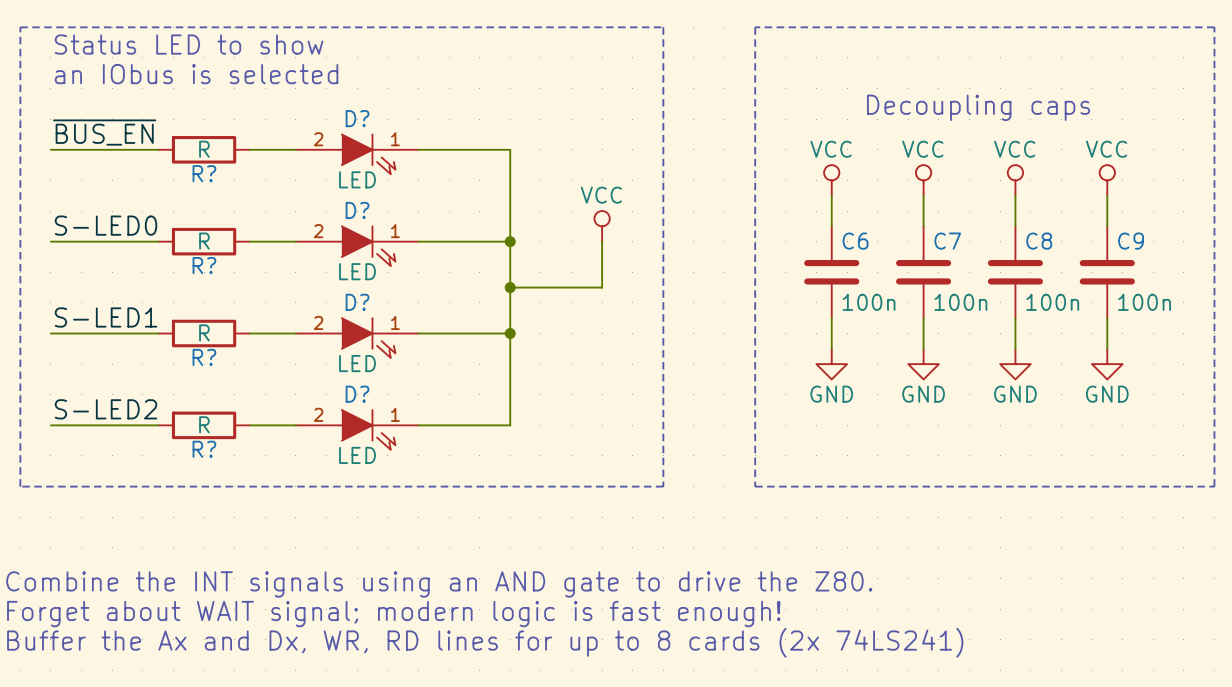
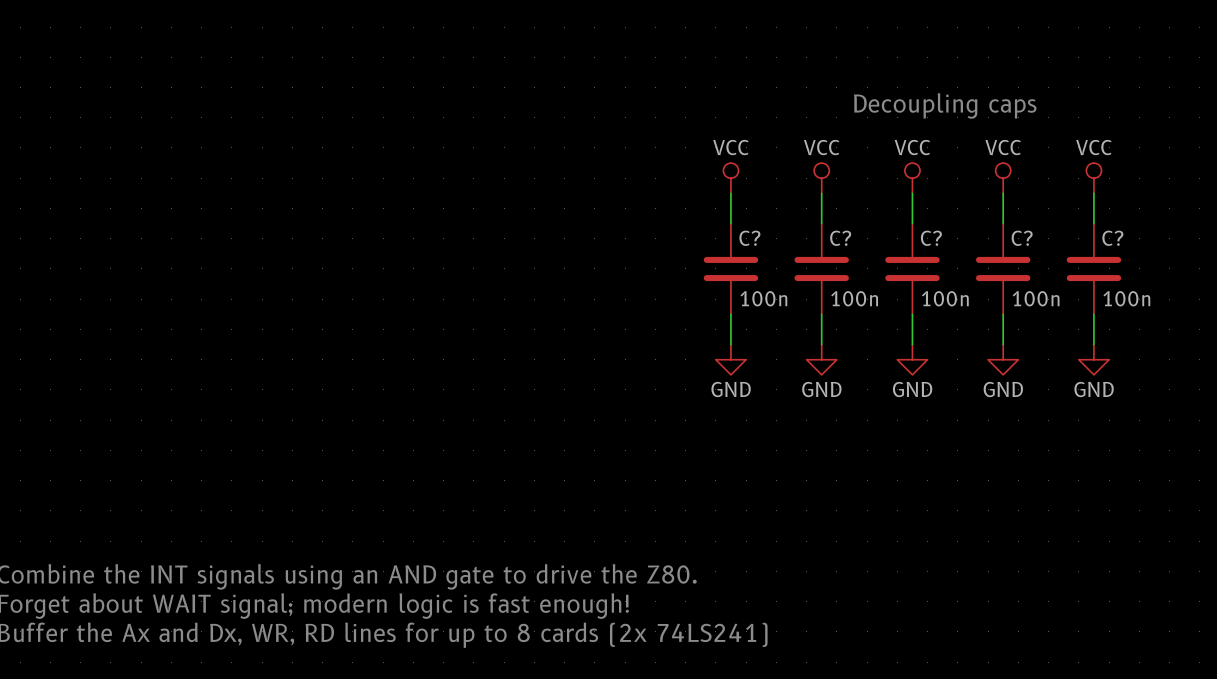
line: (20, 27) (663, 27) (663, 486) (20, 486) (20, 27) -> none
line: (755, 27) (1214, 27) (1214, 486) (755, 486) (755, 27) -> none
text: Status LED to show (189, 44) -> none
text: an IObus is selected (196, 74) -> none
label: ~{BUS_EN} (104, 132) -> none
wire: (50, 149) (158, 149) -> none
R?: R (204, 149) -> none
wire: (249, 149) (295, 149) -> none
wire: (418, 149) (510, 149) (510, 425) (418, 425) -> none
D?: LED (357, 154) -> none
wire: none -> (730, 193) (730, 223)
label: S-LED0 (105, 225) -> none
power symbol position: VCC (602, 226) -> VCC (730, 178)
wire: (50, 241) (158, 241) -> none
R?: R (204, 241) -> none
wire: (249, 241) (295, 241) -> none
wire: (418, 241) (510, 241) -> none
junction: (510, 241) -> none
wire: (602, 241) (602, 287) (510, 287) -> none
C6 name: C6 (855, 241) -> C? (840, 238)
C7 name: C7 (947, 241) -> C? (931, 238)
C8 name: C8 (1039, 241) -> C? (1022, 238)
C9 name: C9 (1131, 241) -> C? (1112, 238)
D?: LED (357, 246) -> none
C?: none -> 100n (730, 268)
junction: (510, 287) -> none
label: S-LED1 (105, 317) -> none
wire: none -> (730, 314) (730, 344)
wire: (50, 333) (158, 333) -> none
R?: R (204, 333) -> none
wire: (249, 333) (295, 333) -> none
wire: (418, 333) (510, 333) -> none
junction: (510, 333) -> none
D?: LED (357, 338) -> none
power symbol: none -> GND (730, 359)
label: S-LED2 (105, 409) -> none
wire: (50, 425) (158, 425) -> none
R?: R (204, 425) -> none
wire: (249, 425) (295, 425) -> none
D?: LED (357, 429) -> none

